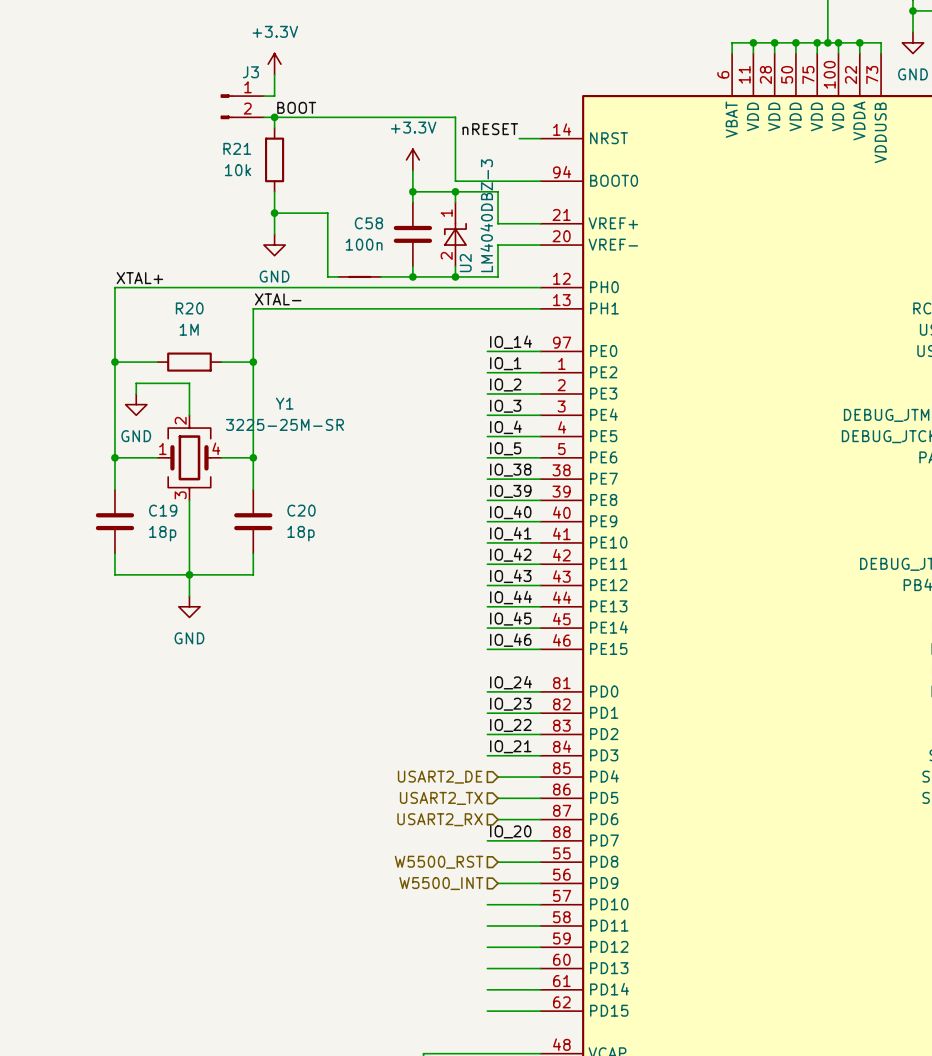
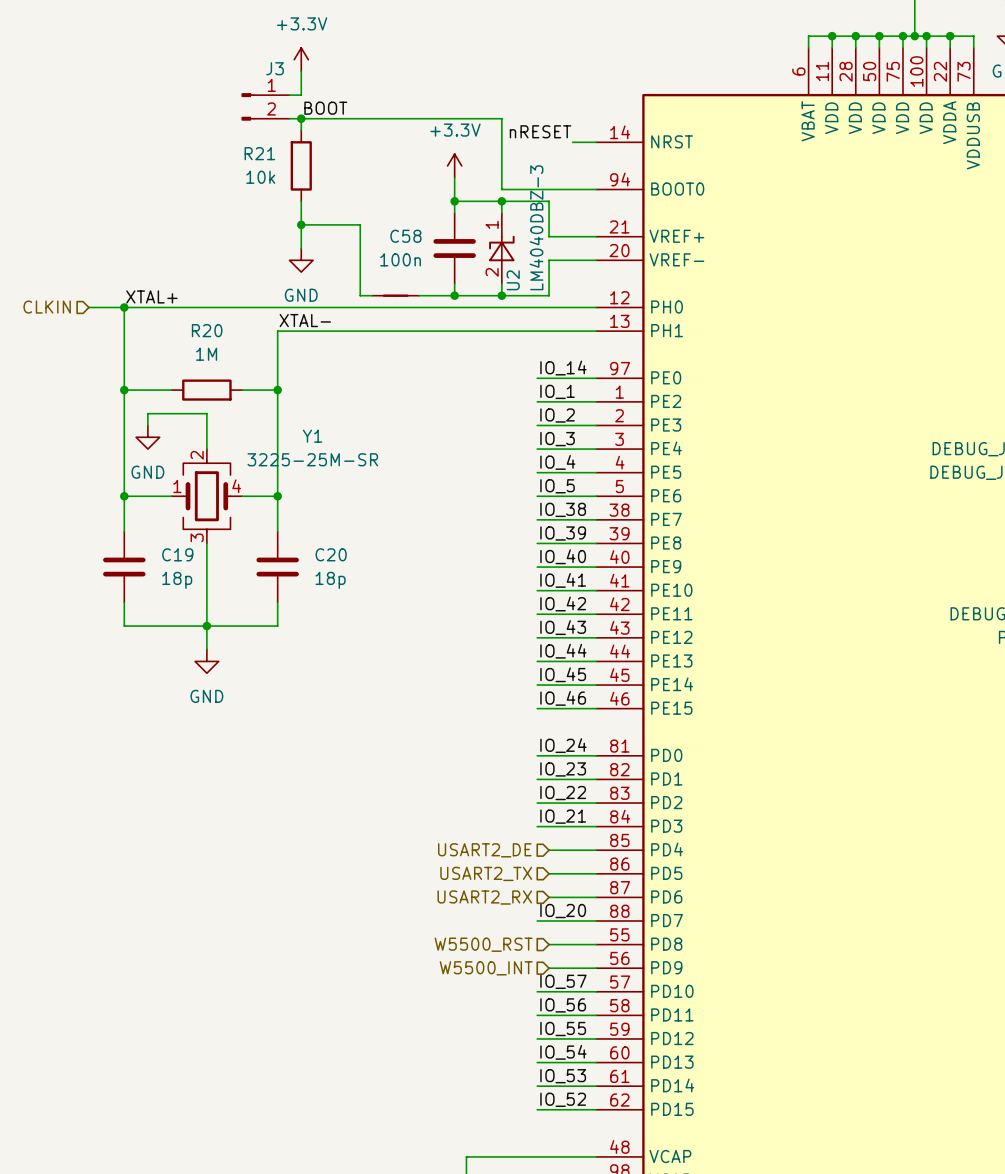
hierarchical label: none -> CLKIN (47, 307)
wire: none -> (88, 307) (124, 307)
junction: none -> (124, 307)
label: none -> IO_57 (563, 981)
label: none -> IO_56 (563, 1005)
label: none -> IO_55 (563, 1029)
label: none -> IO_54 (563, 1052)
label: none -> IO_53 (563, 1076)
label: none -> IO_52 (563, 1099)

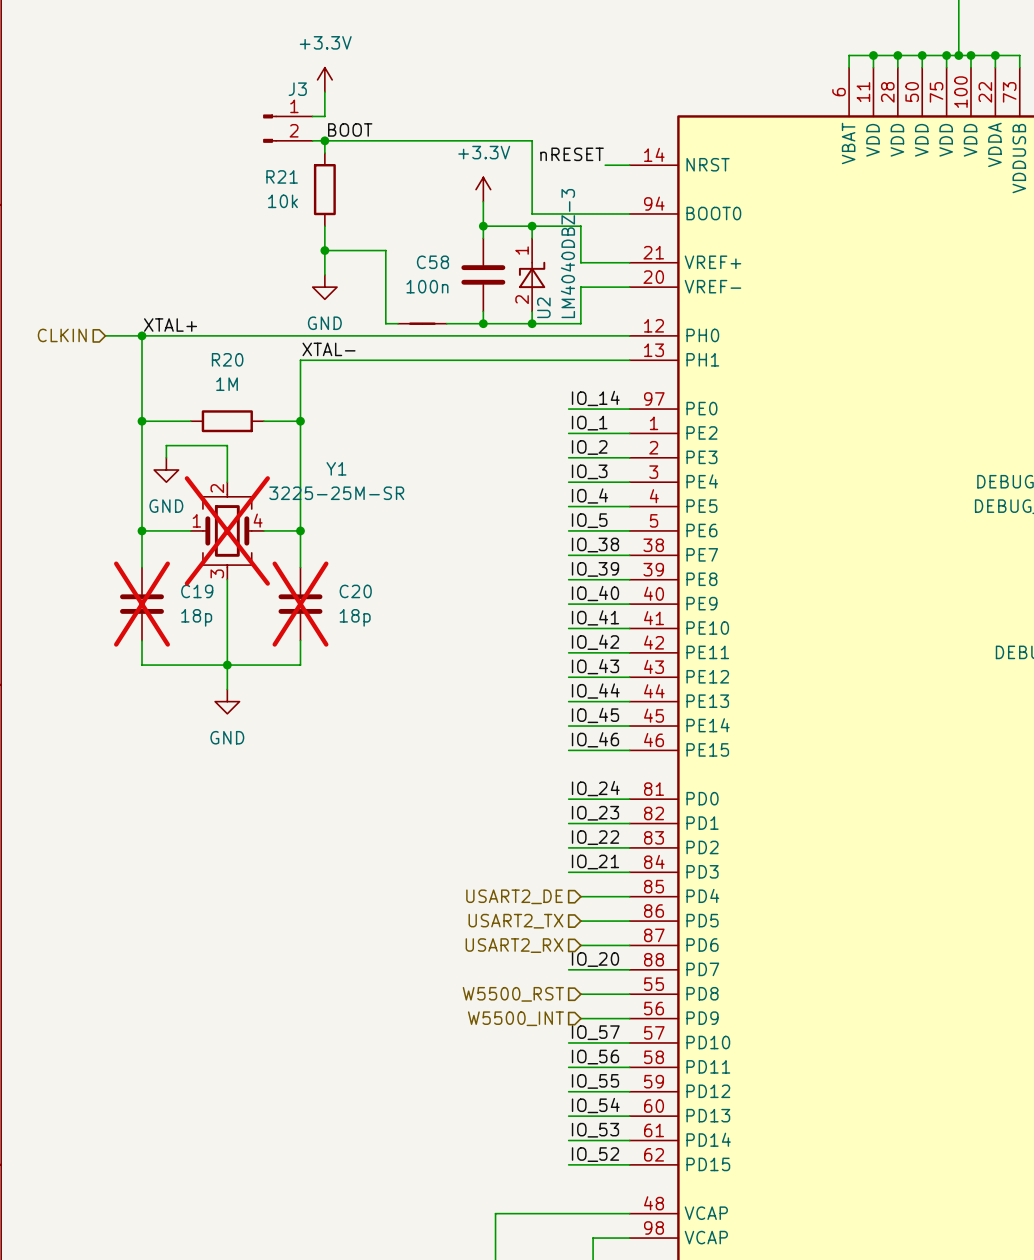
Y1 do-not-place cross: none -> (227, 530)
C19 do-not-place cross: none -> (142, 604)
C20 do-not-place cross: none -> (300, 604)

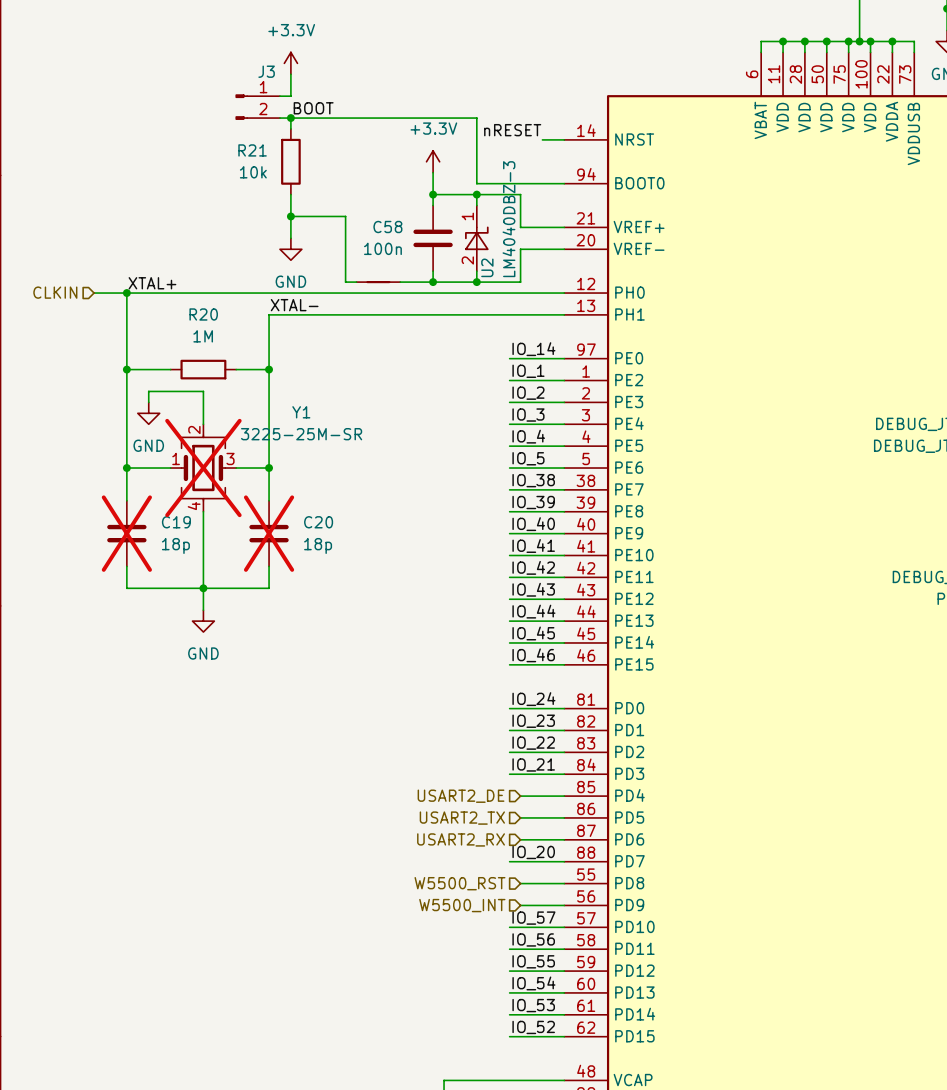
Y1 pin number: 4 (258, 520) -> 3 (230, 458)
Y1 pin number: 3 (217, 573) -> 4 (194, 506)

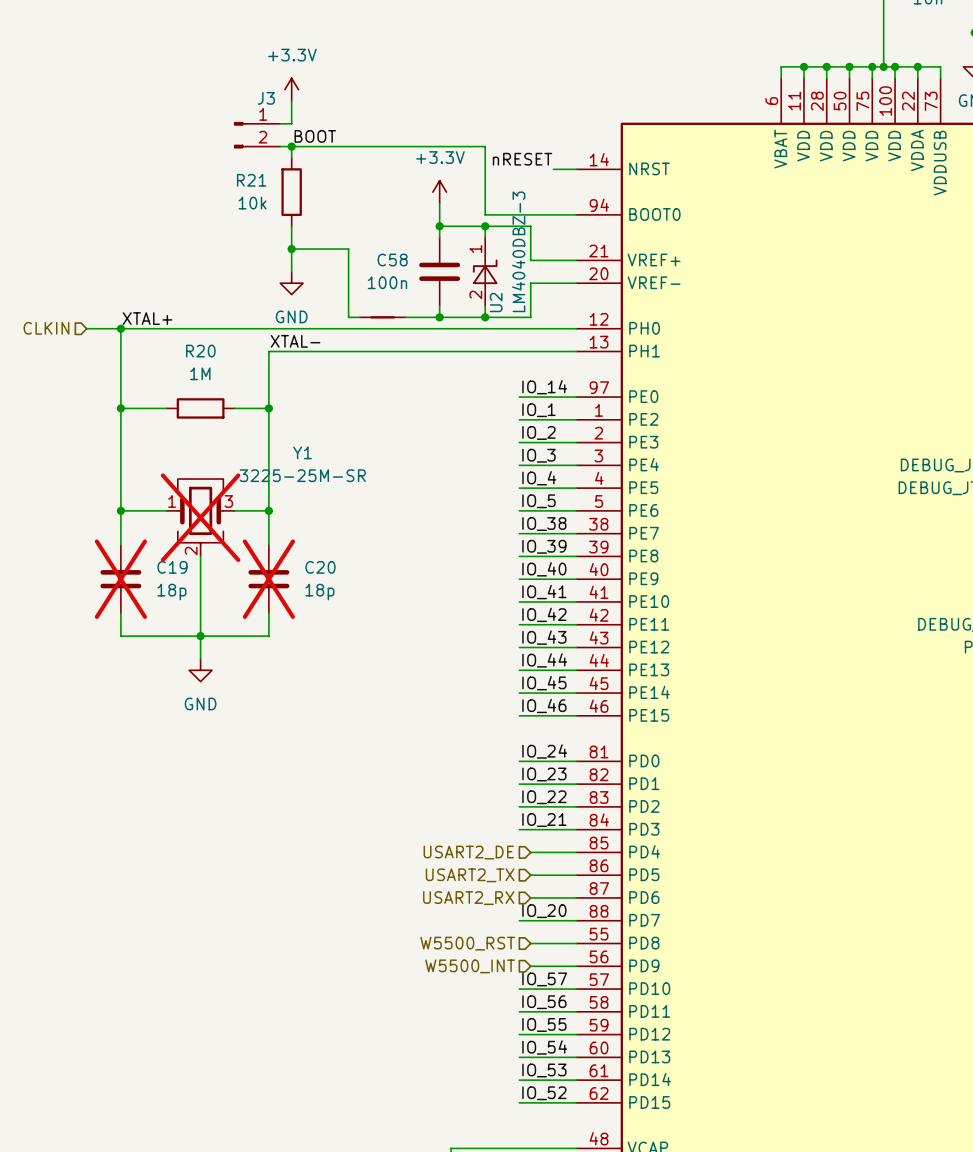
wire: (148, 402) (148, 391) (203, 391) (203, 424) -> none
power symbol: GND (148, 413) -> none
Y1 symbol: [170, 424, 237, 512] -> [166, 479, 235, 557]

